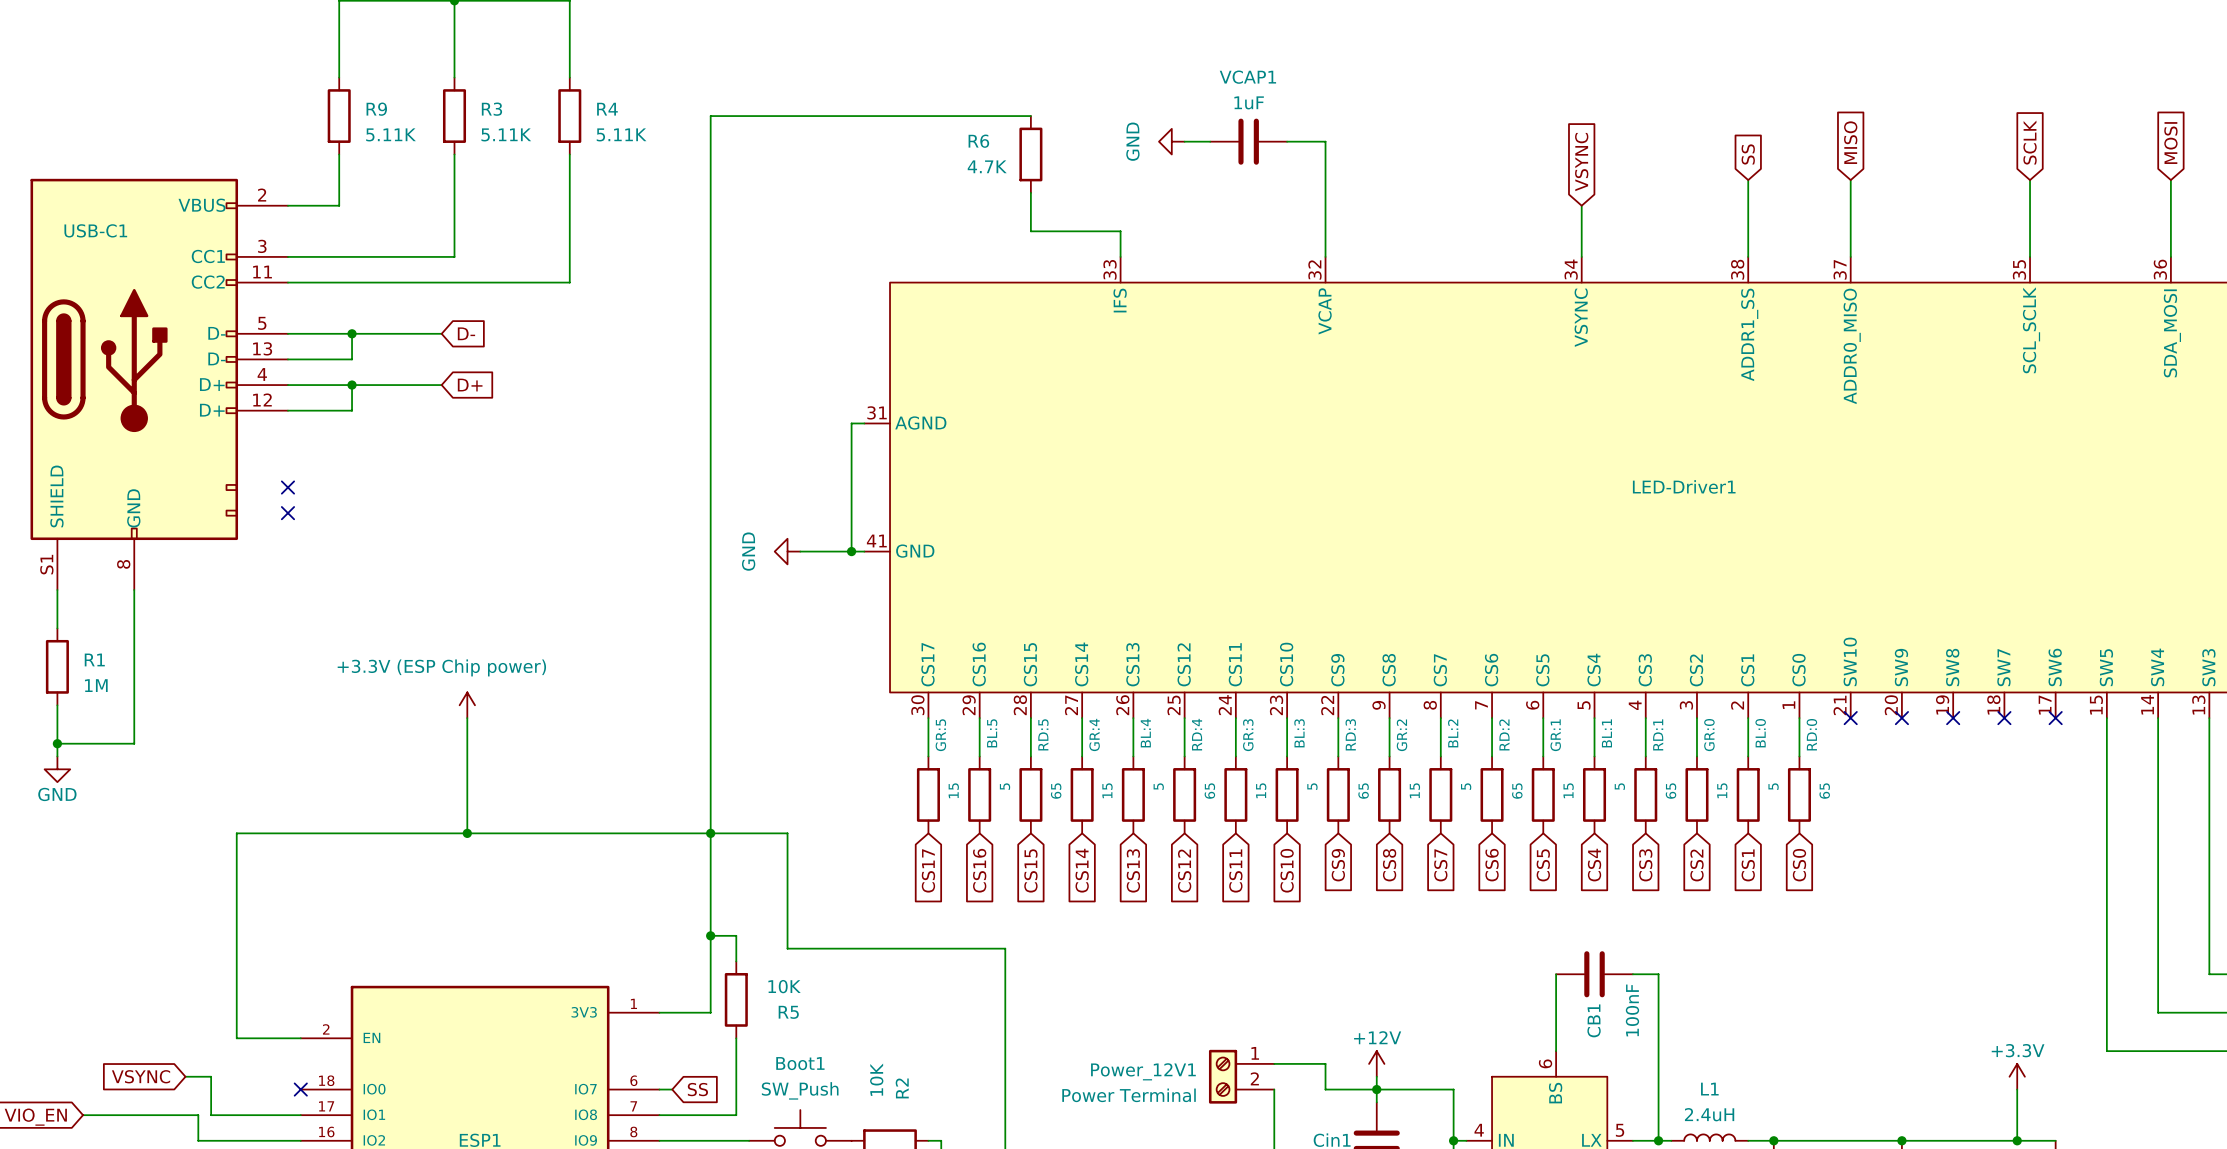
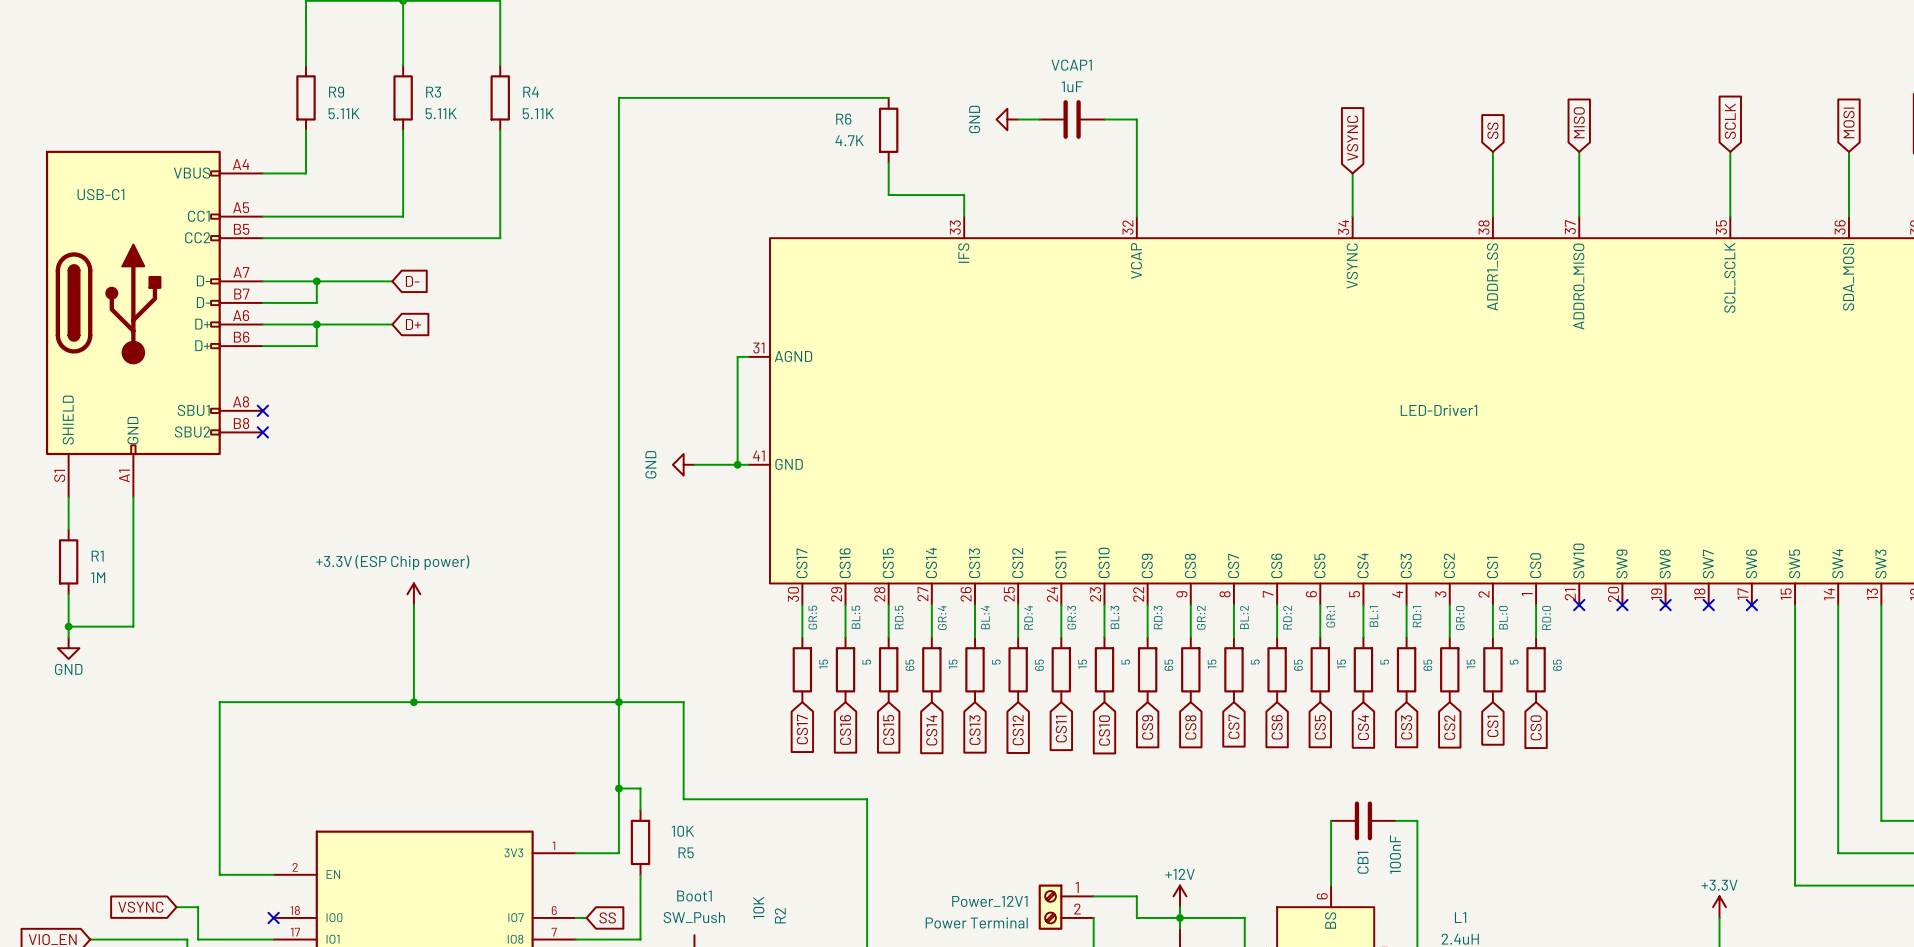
USB-C1 symbol: [30, 178, 288, 590] -> [45, 150, 263, 498]

